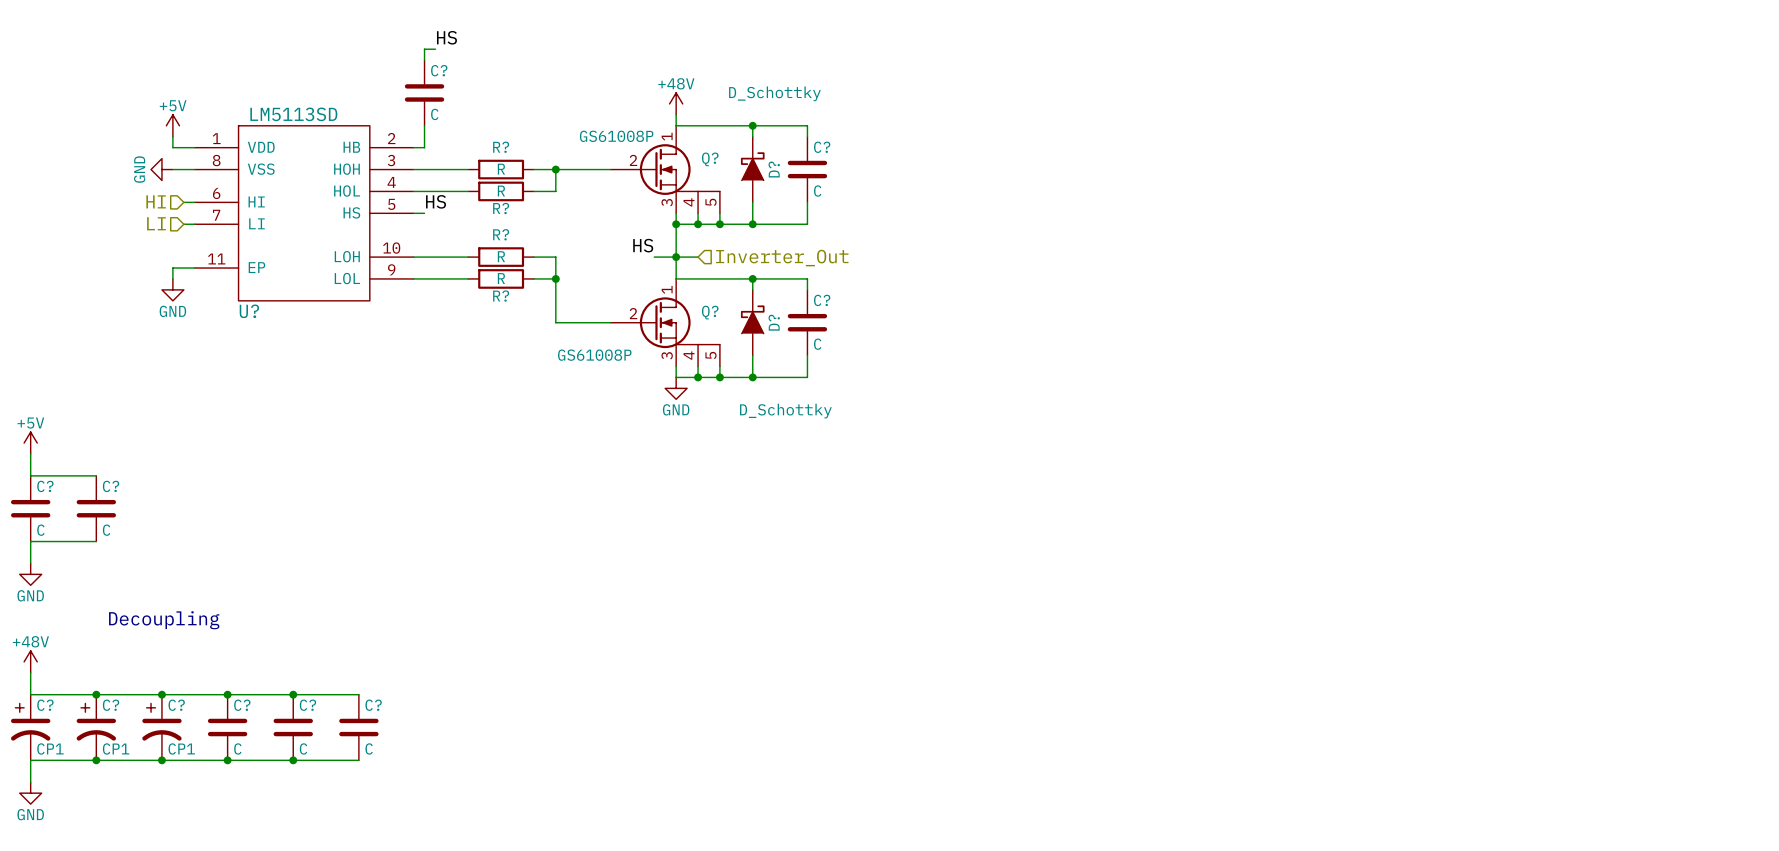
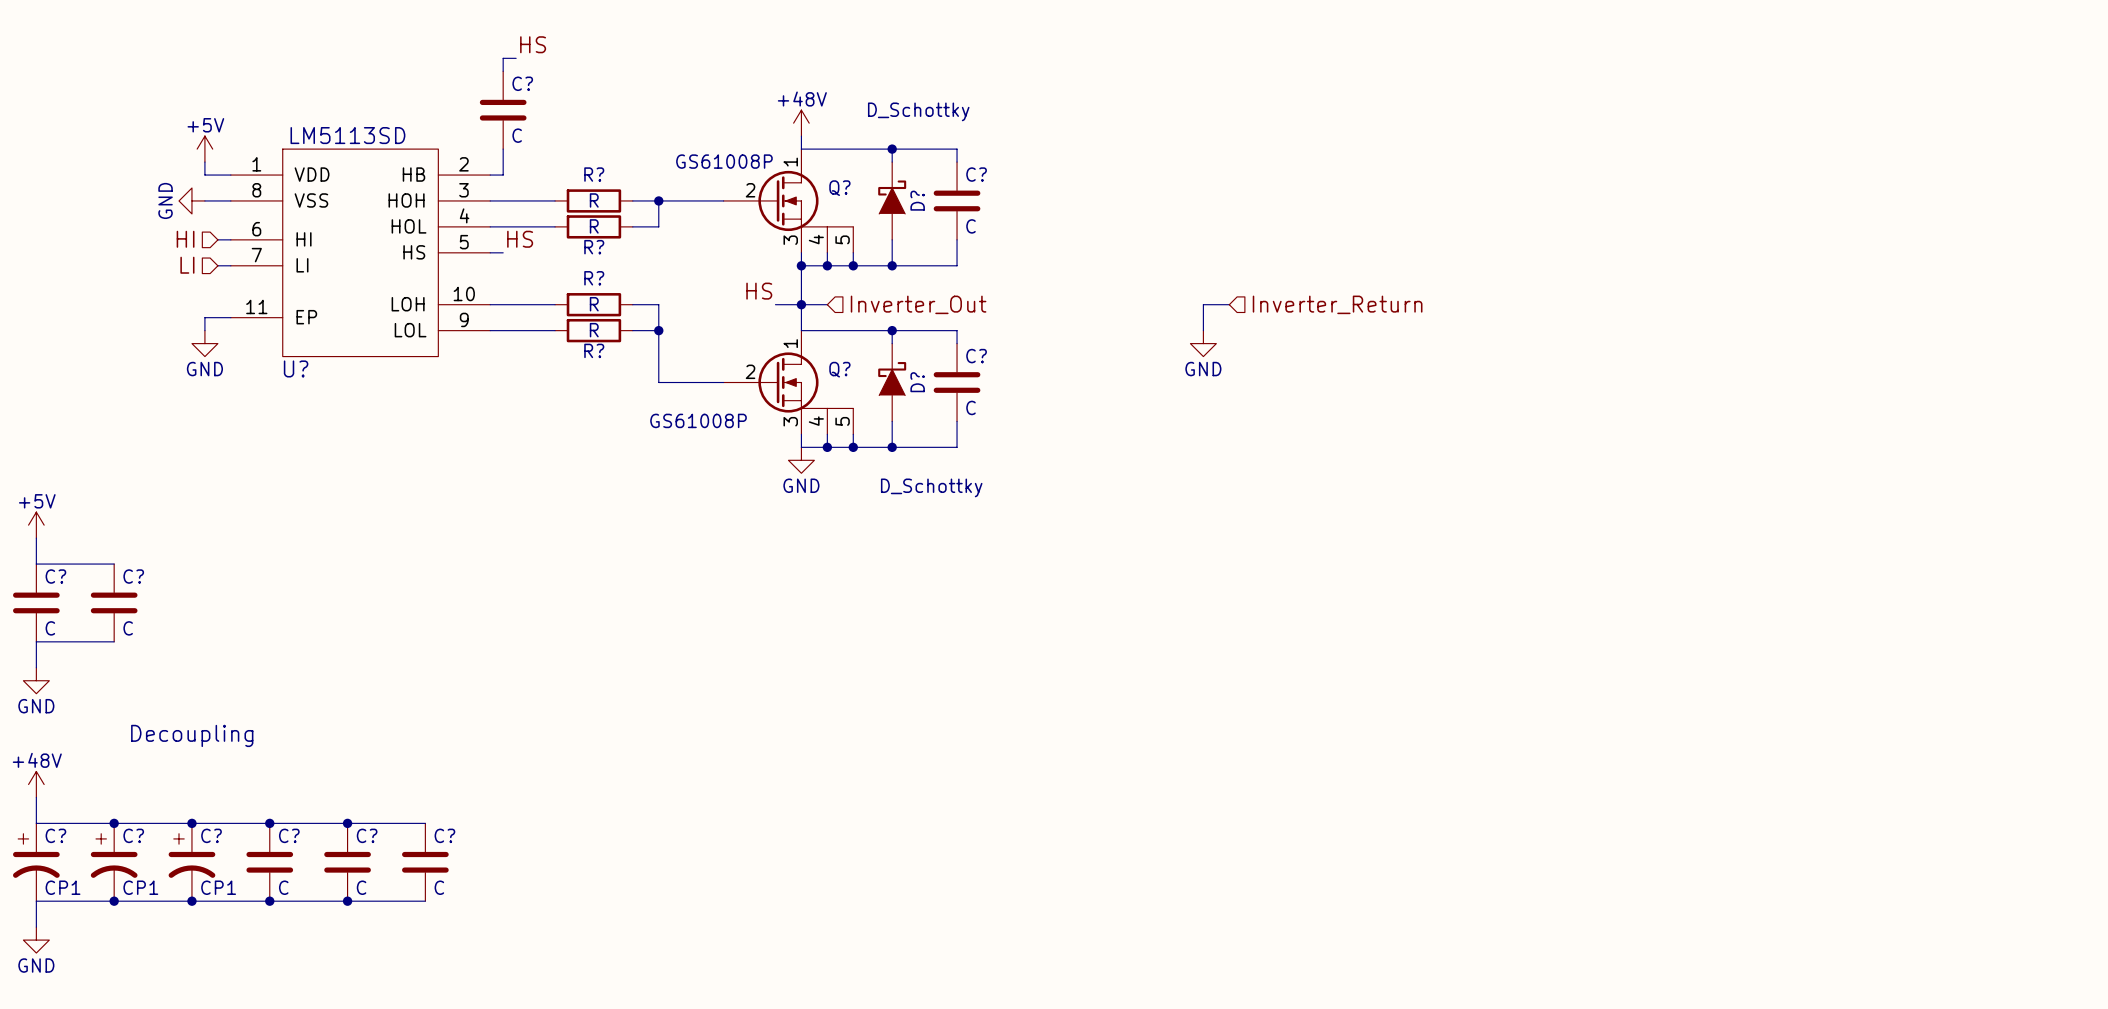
wire: none -> (1229, 304) (1203, 304) (1203, 330)
hierarchical label: none -> Inverter_Return (1337, 304)
power symbol: none -> GND (1203, 343)

